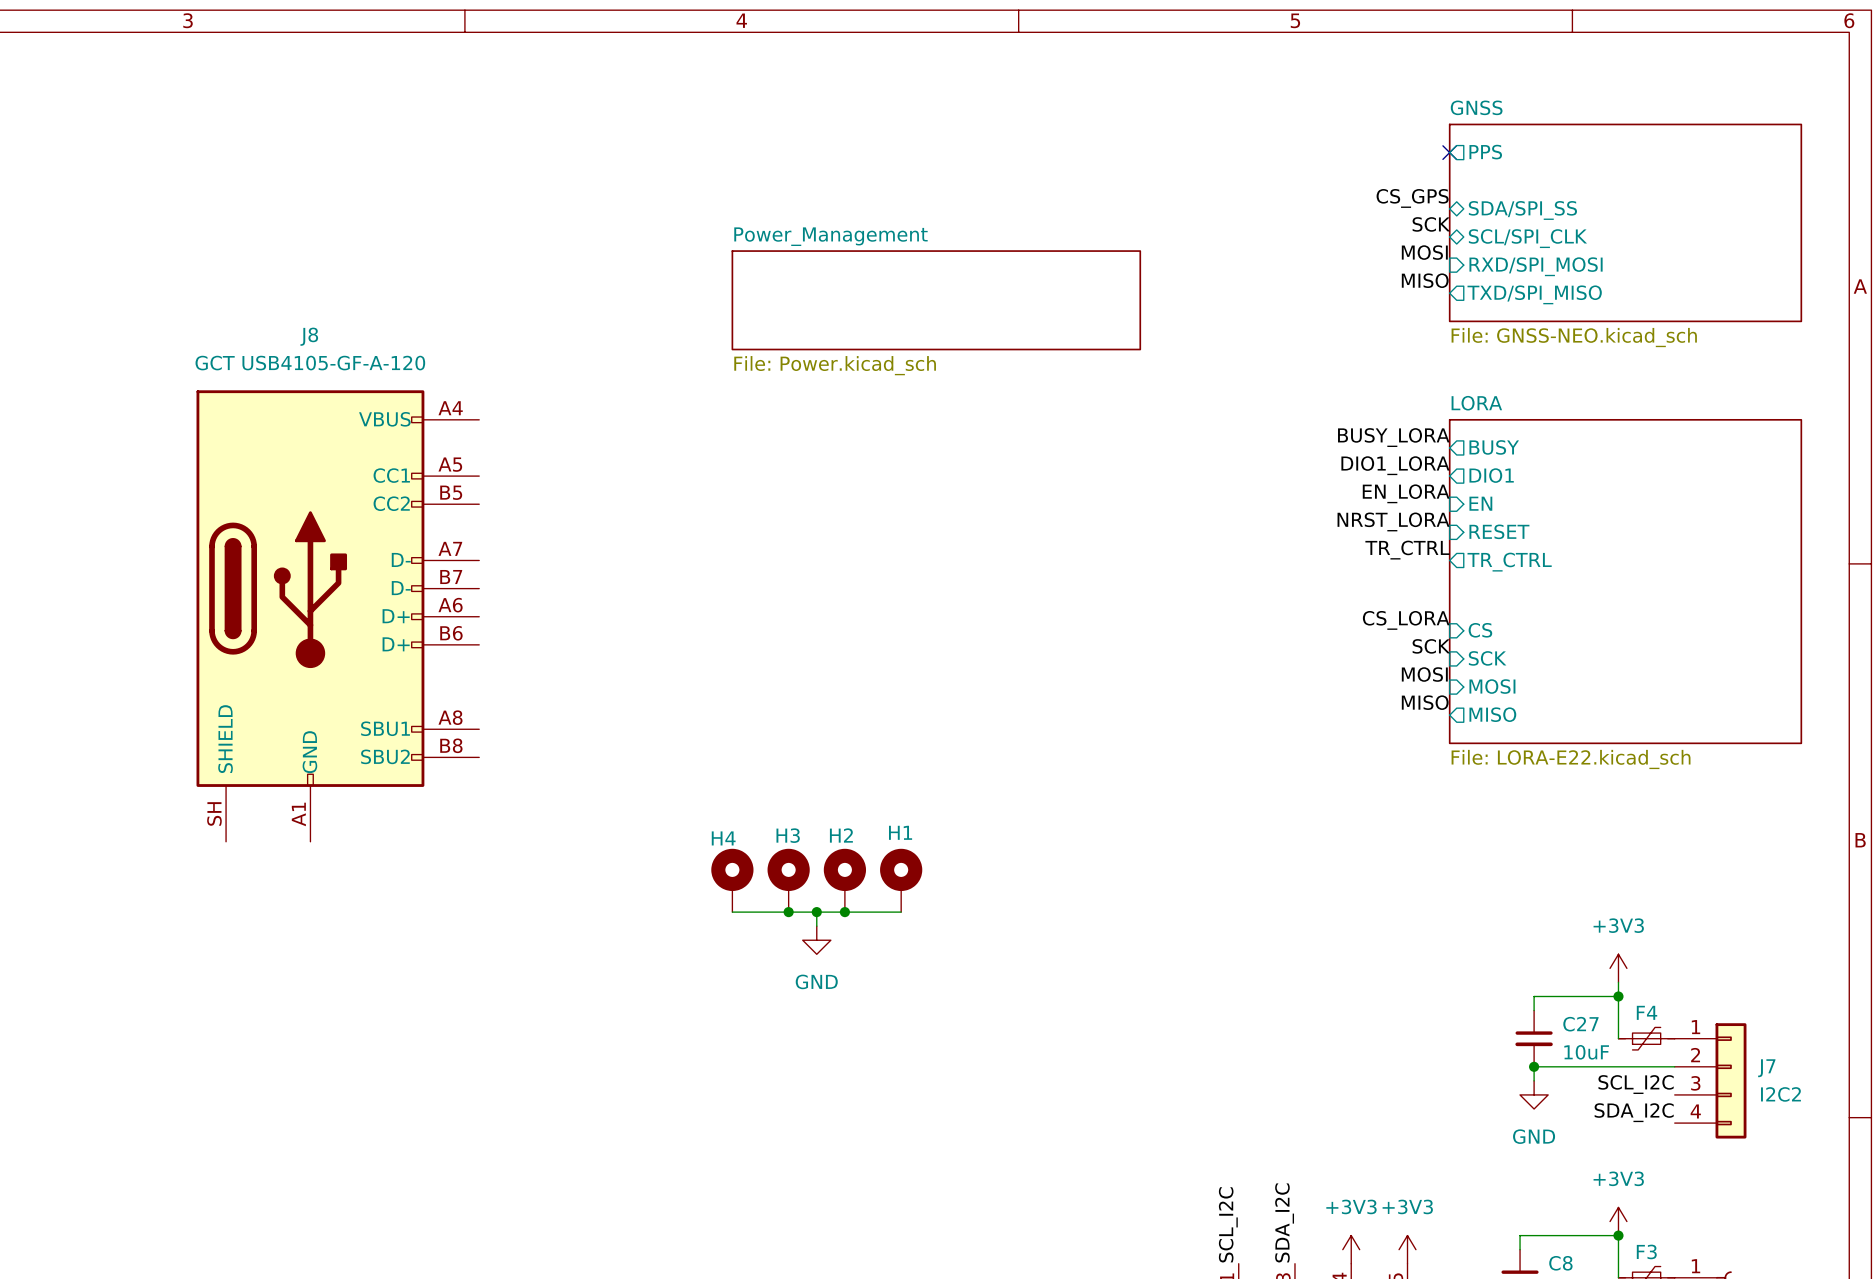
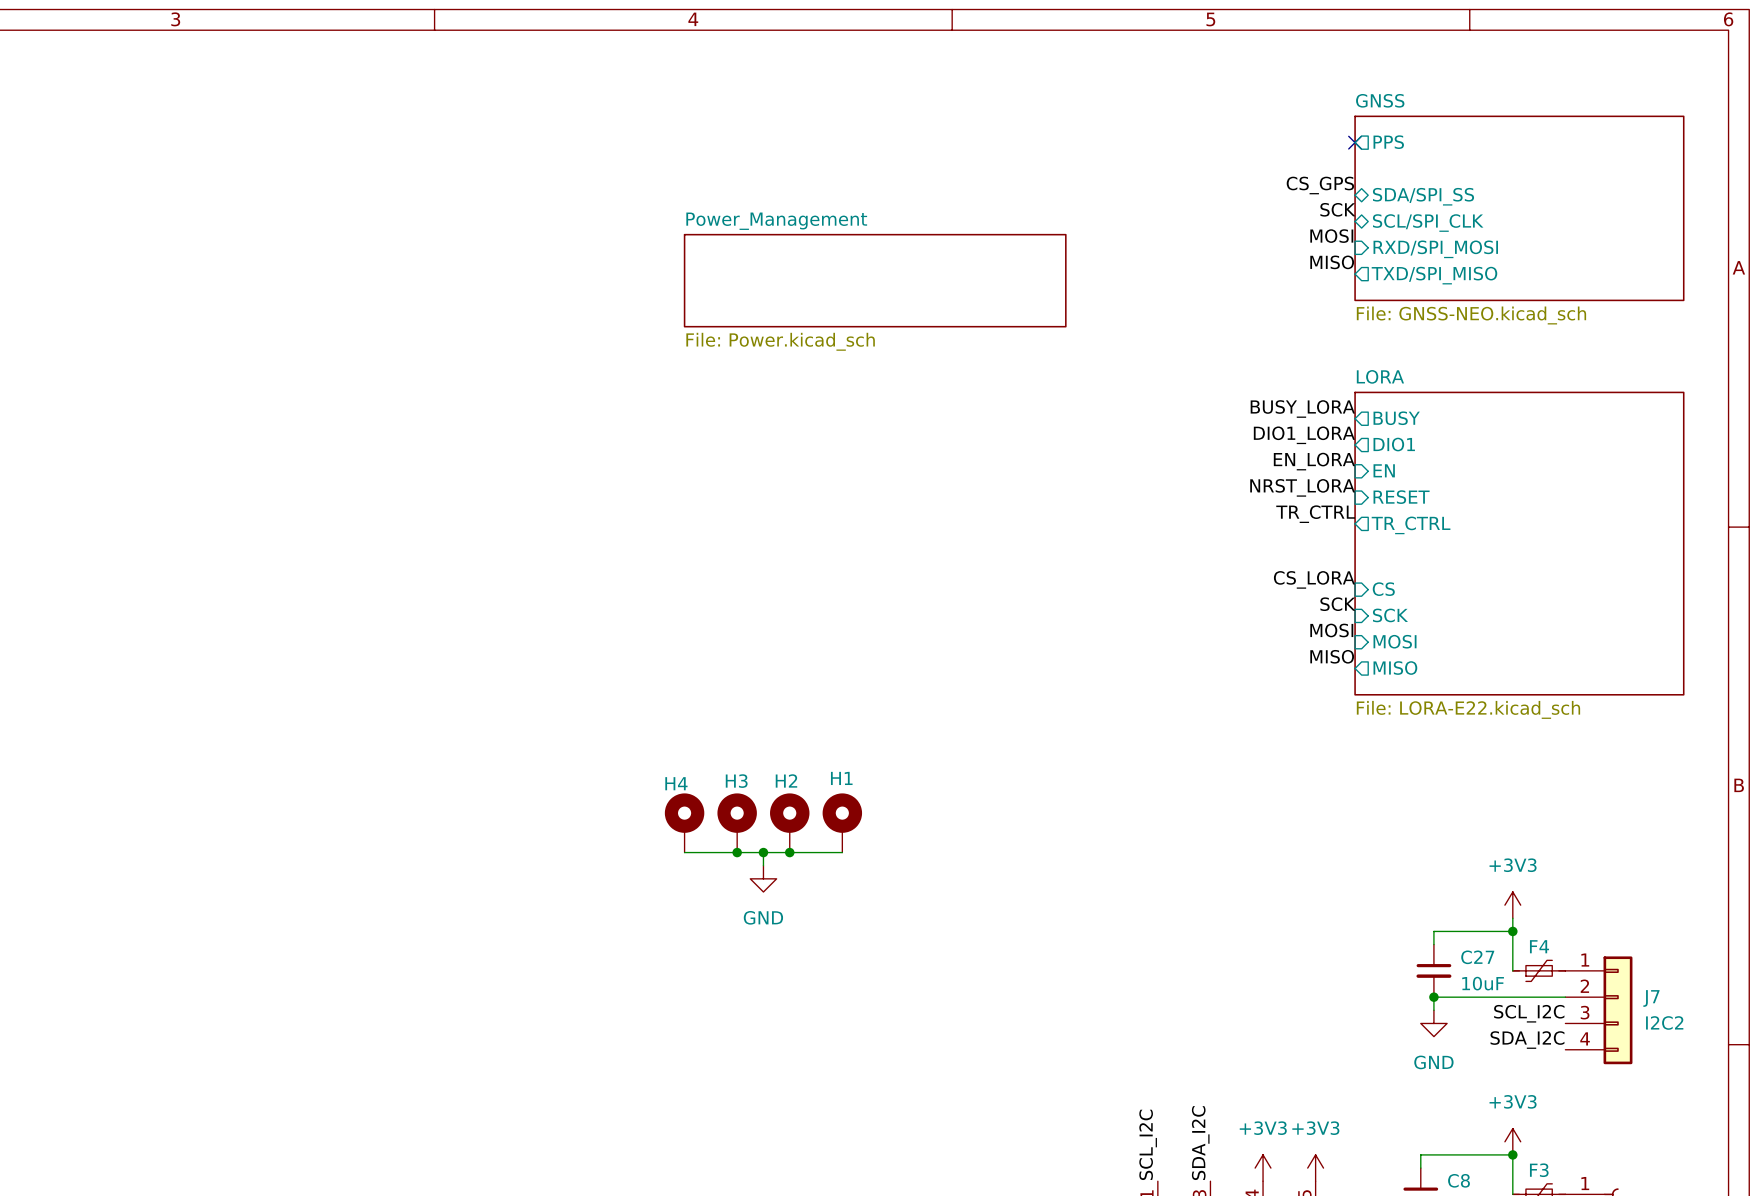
J8: GCT USB4105-GF-A-120 (337, 616) -> none

